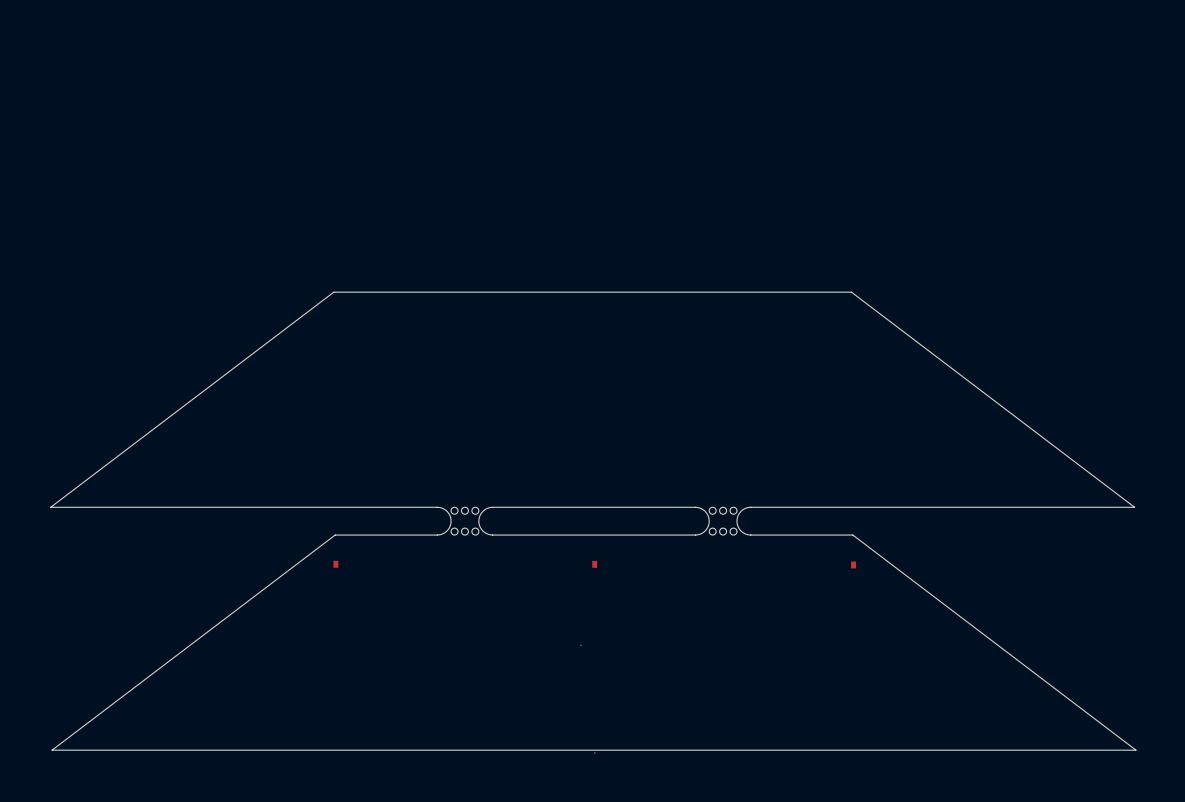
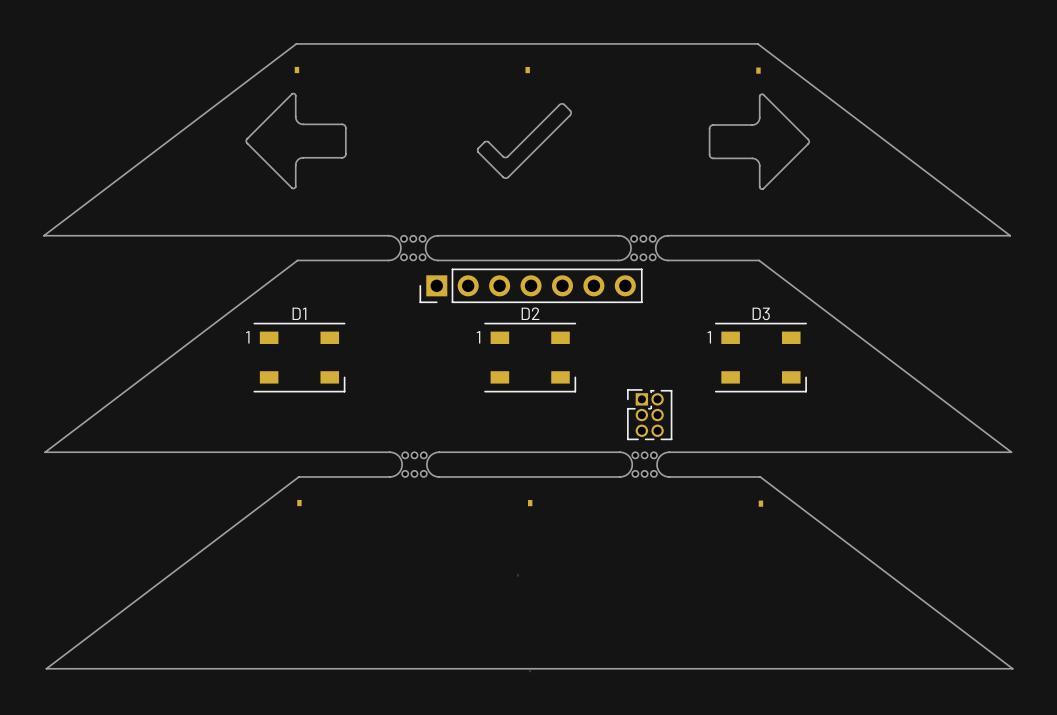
part: none -> (296, 70)
part: none -> (527, 70)
part: none -> (758, 70)
board edge: none -> (292, 94) (246, 141) (293, 188) (295, 186) (295, 163) (299, 158) (345, 156) (345, 128) (342, 124) (299, 123) (295, 117) (295, 95) (292, 94)
board edge: none -> (763, 94) (809, 141) (762, 189) (759, 187) (759, 163) (755, 159) (710, 156) (709, 128) (712, 125) (755, 123) (759, 118) (759, 95) (763, 94)
board edge: none -> (564, 104) (570, 111) (570, 115) (507, 177) (503, 177) (478, 151) (478, 148) (486, 141) (503, 156) (507, 157) (559, 104) (564, 104)
part: none -> (413, 248)
part: none -> (643, 248)
board edge: (435, 292) (491, 292) -> (388, 260) (397, 256) (400, 248) (398, 240) (390, 235) (43, 235) (296, 43) (757, 43) (1010, 235) (666, 235) (658, 240) (655, 249) (660, 257) (668, 260)
board edge: (693, 292) (749, 292) -> (618, 260) (627, 256) (631, 248) (627, 239) (618, 235) (436, 235) (428, 240) (425, 248) (429, 256) (438, 260)
part: none -> (531, 285)
D1: none -> (299, 357)
D2: none -> (530, 357)
D3: none -> (760, 357)
part: none -> (649, 414)

